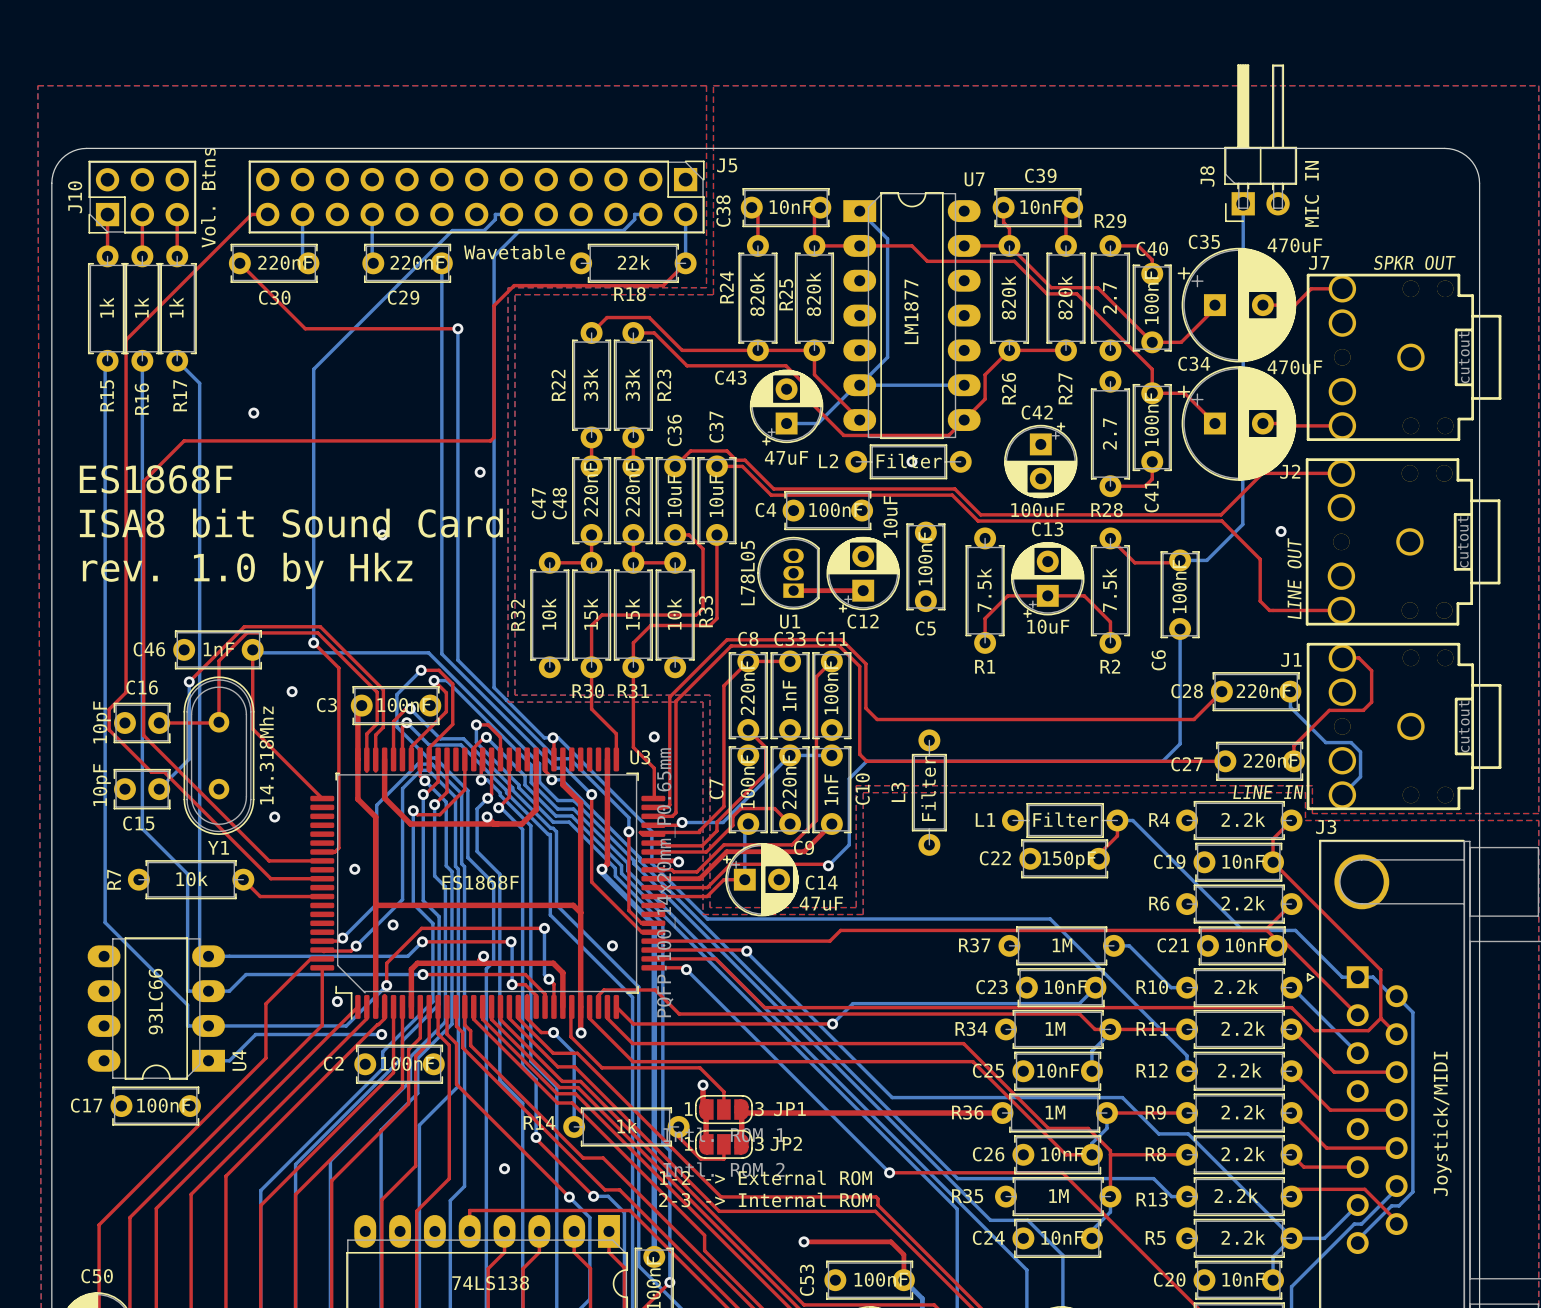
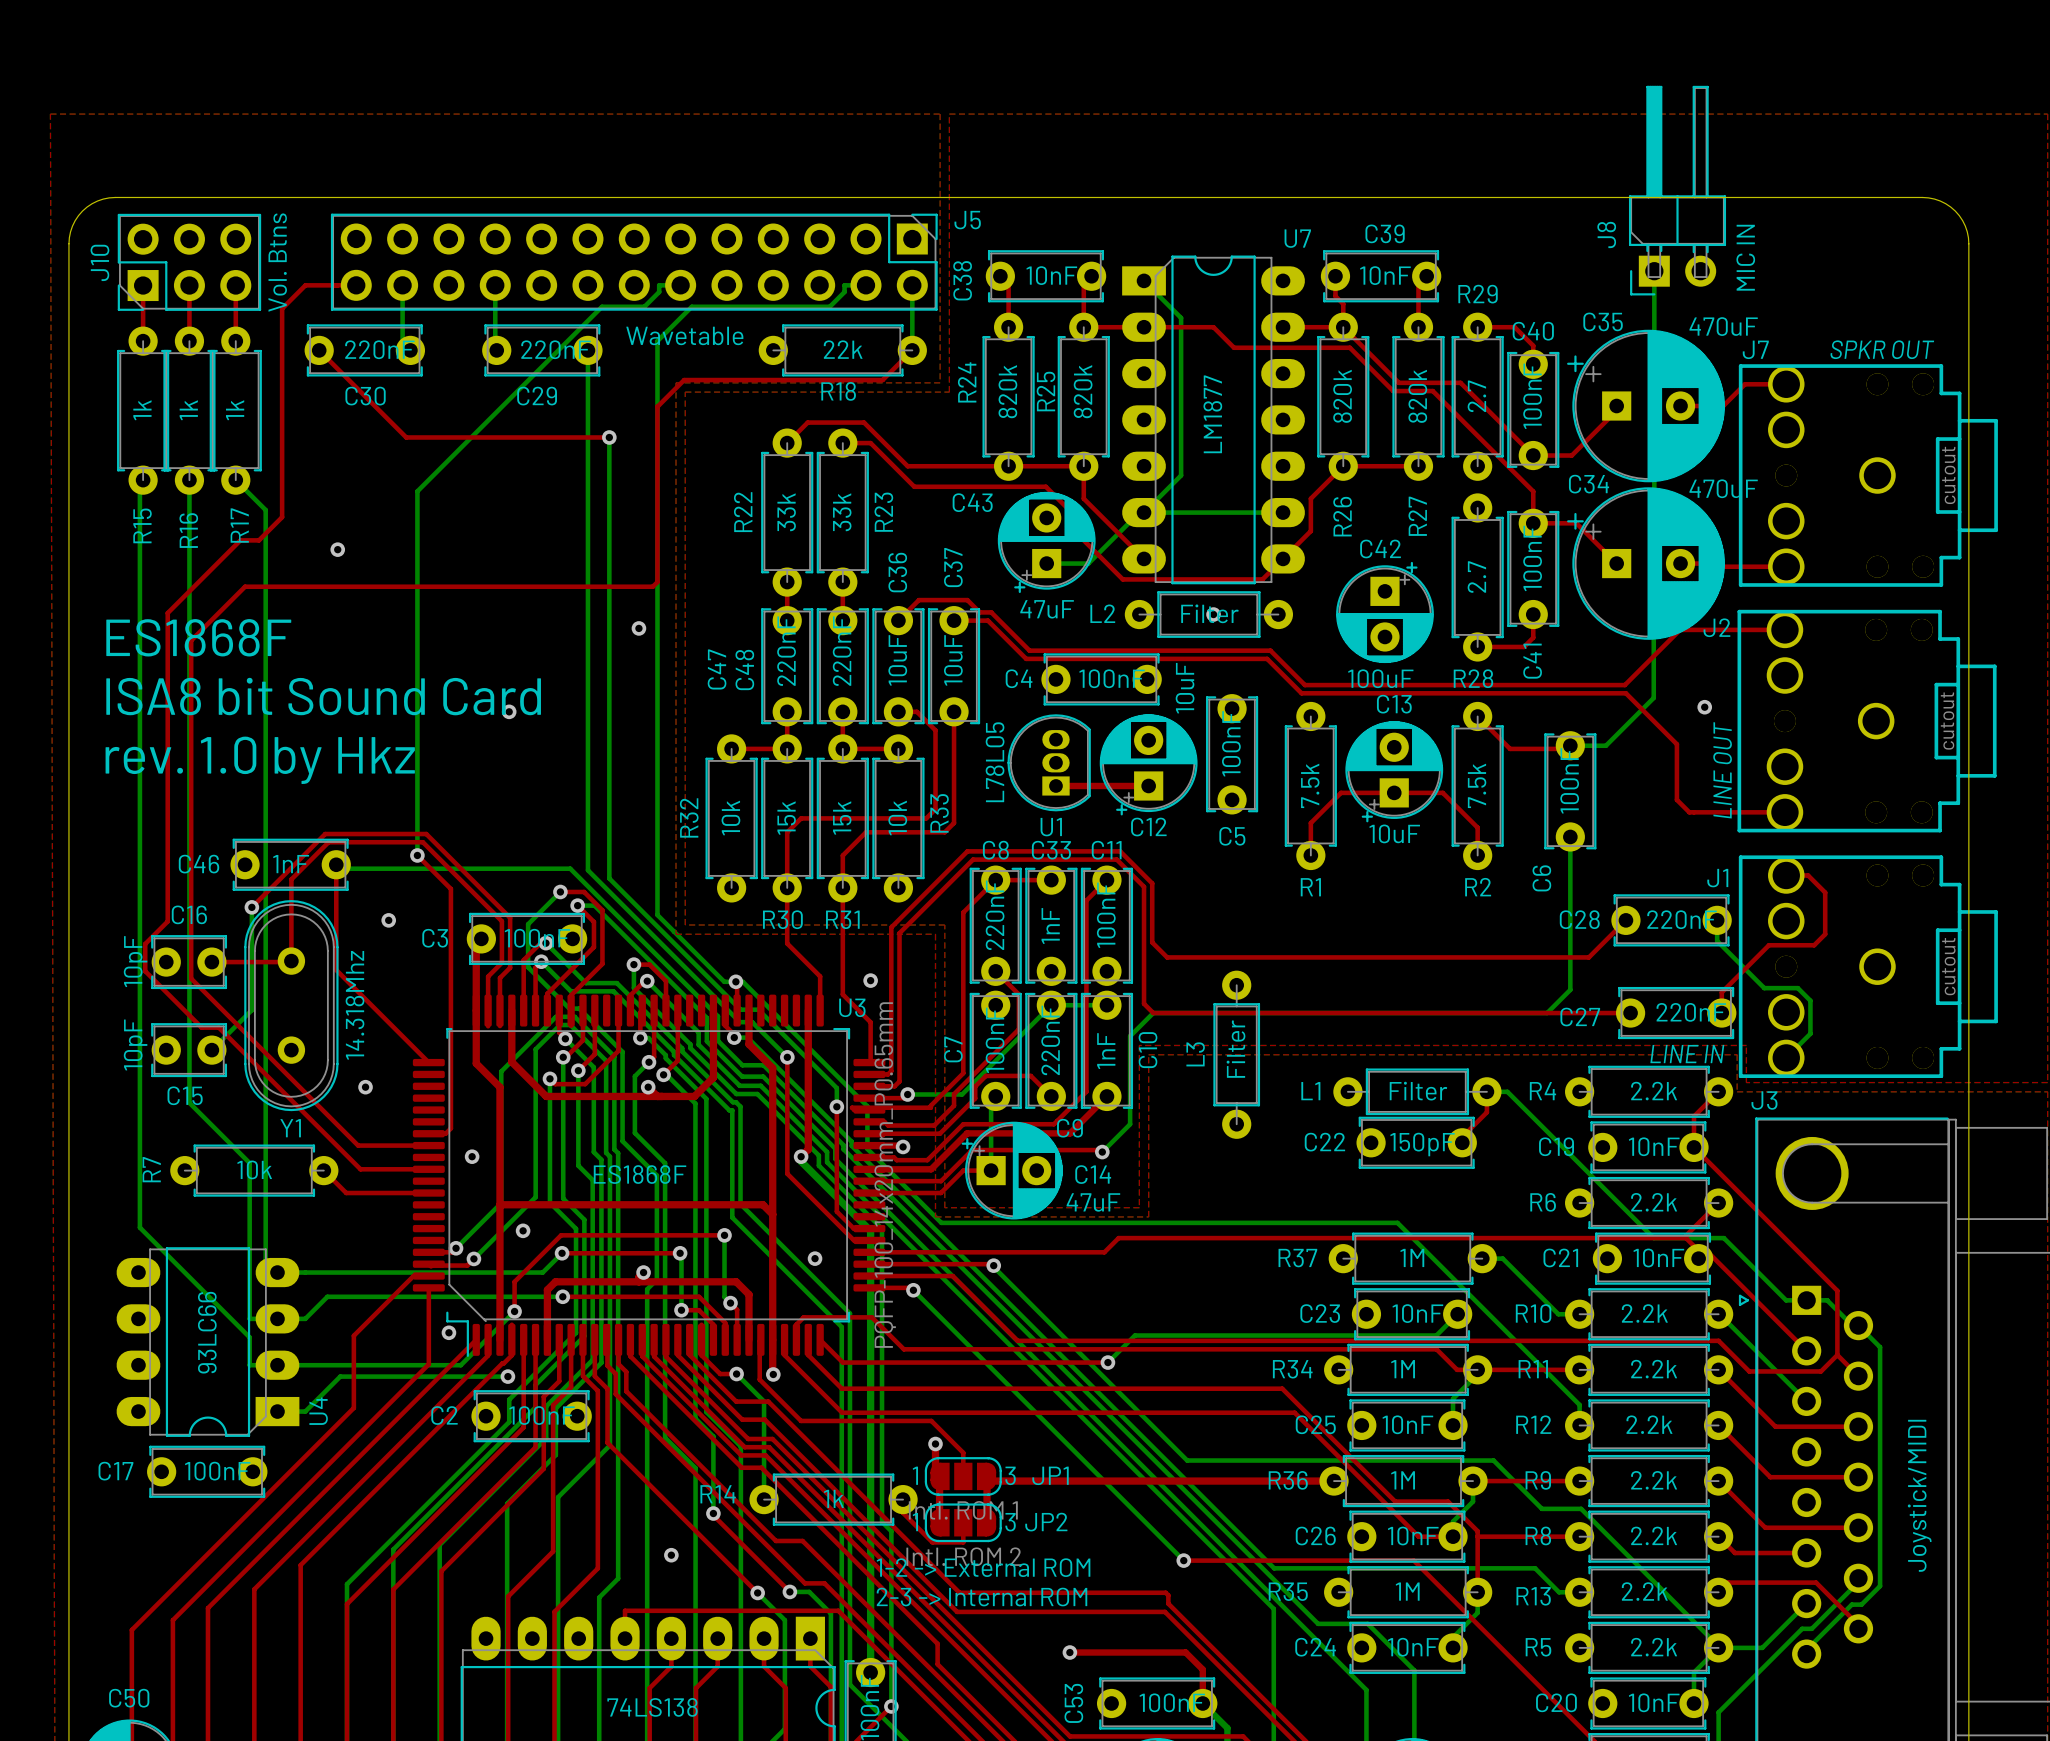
top track: (251, 214) (126, 340) (126, 460) -> (334, 285) (305, 285) (282, 308) (282, 517) (258, 540) (240, 540) (167, 613)

